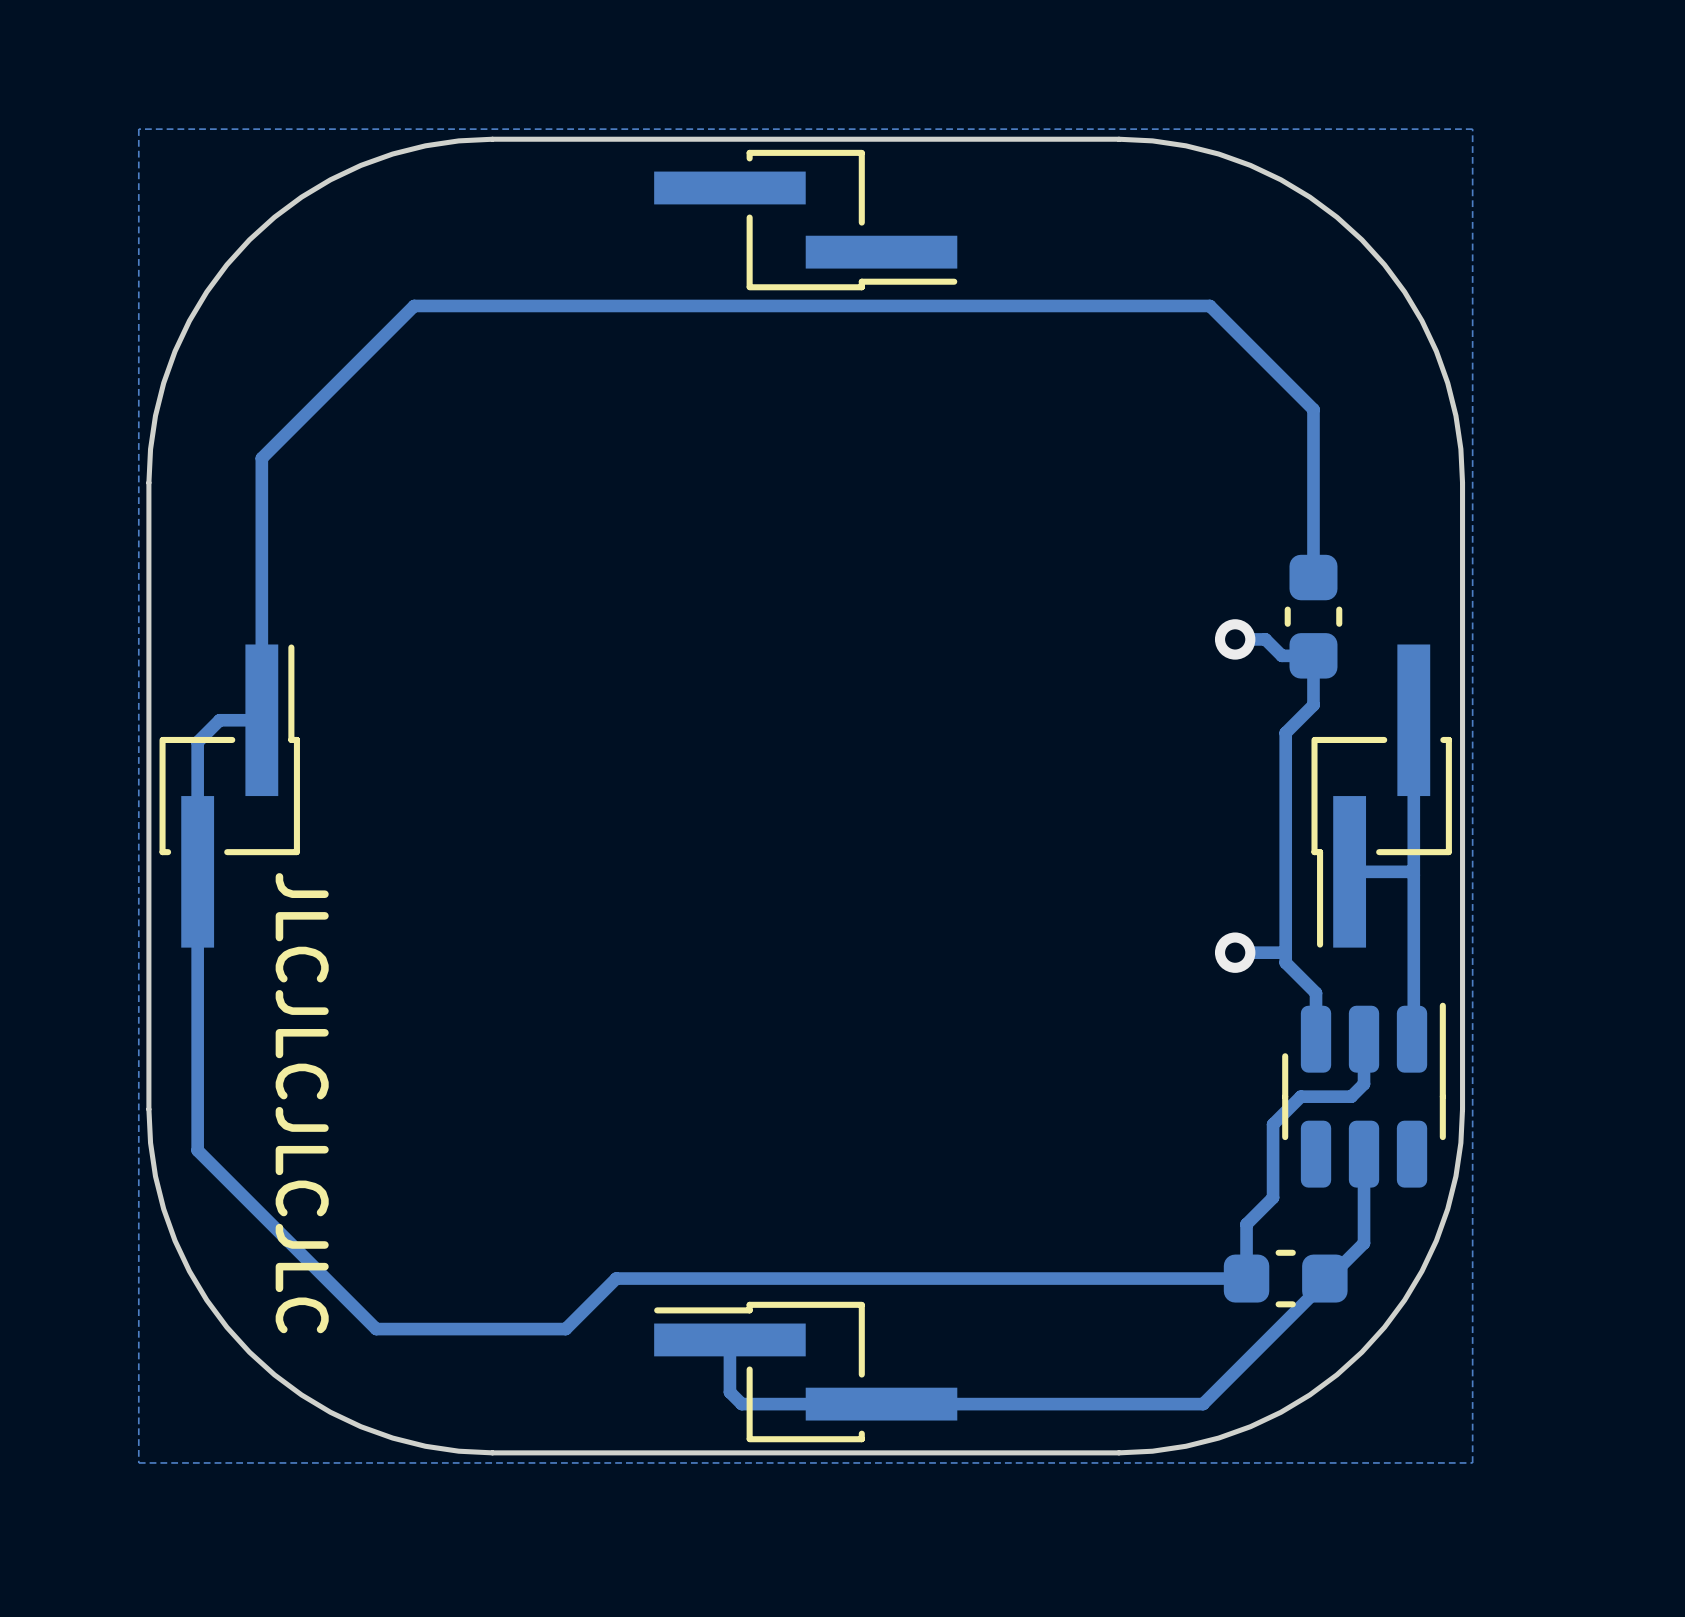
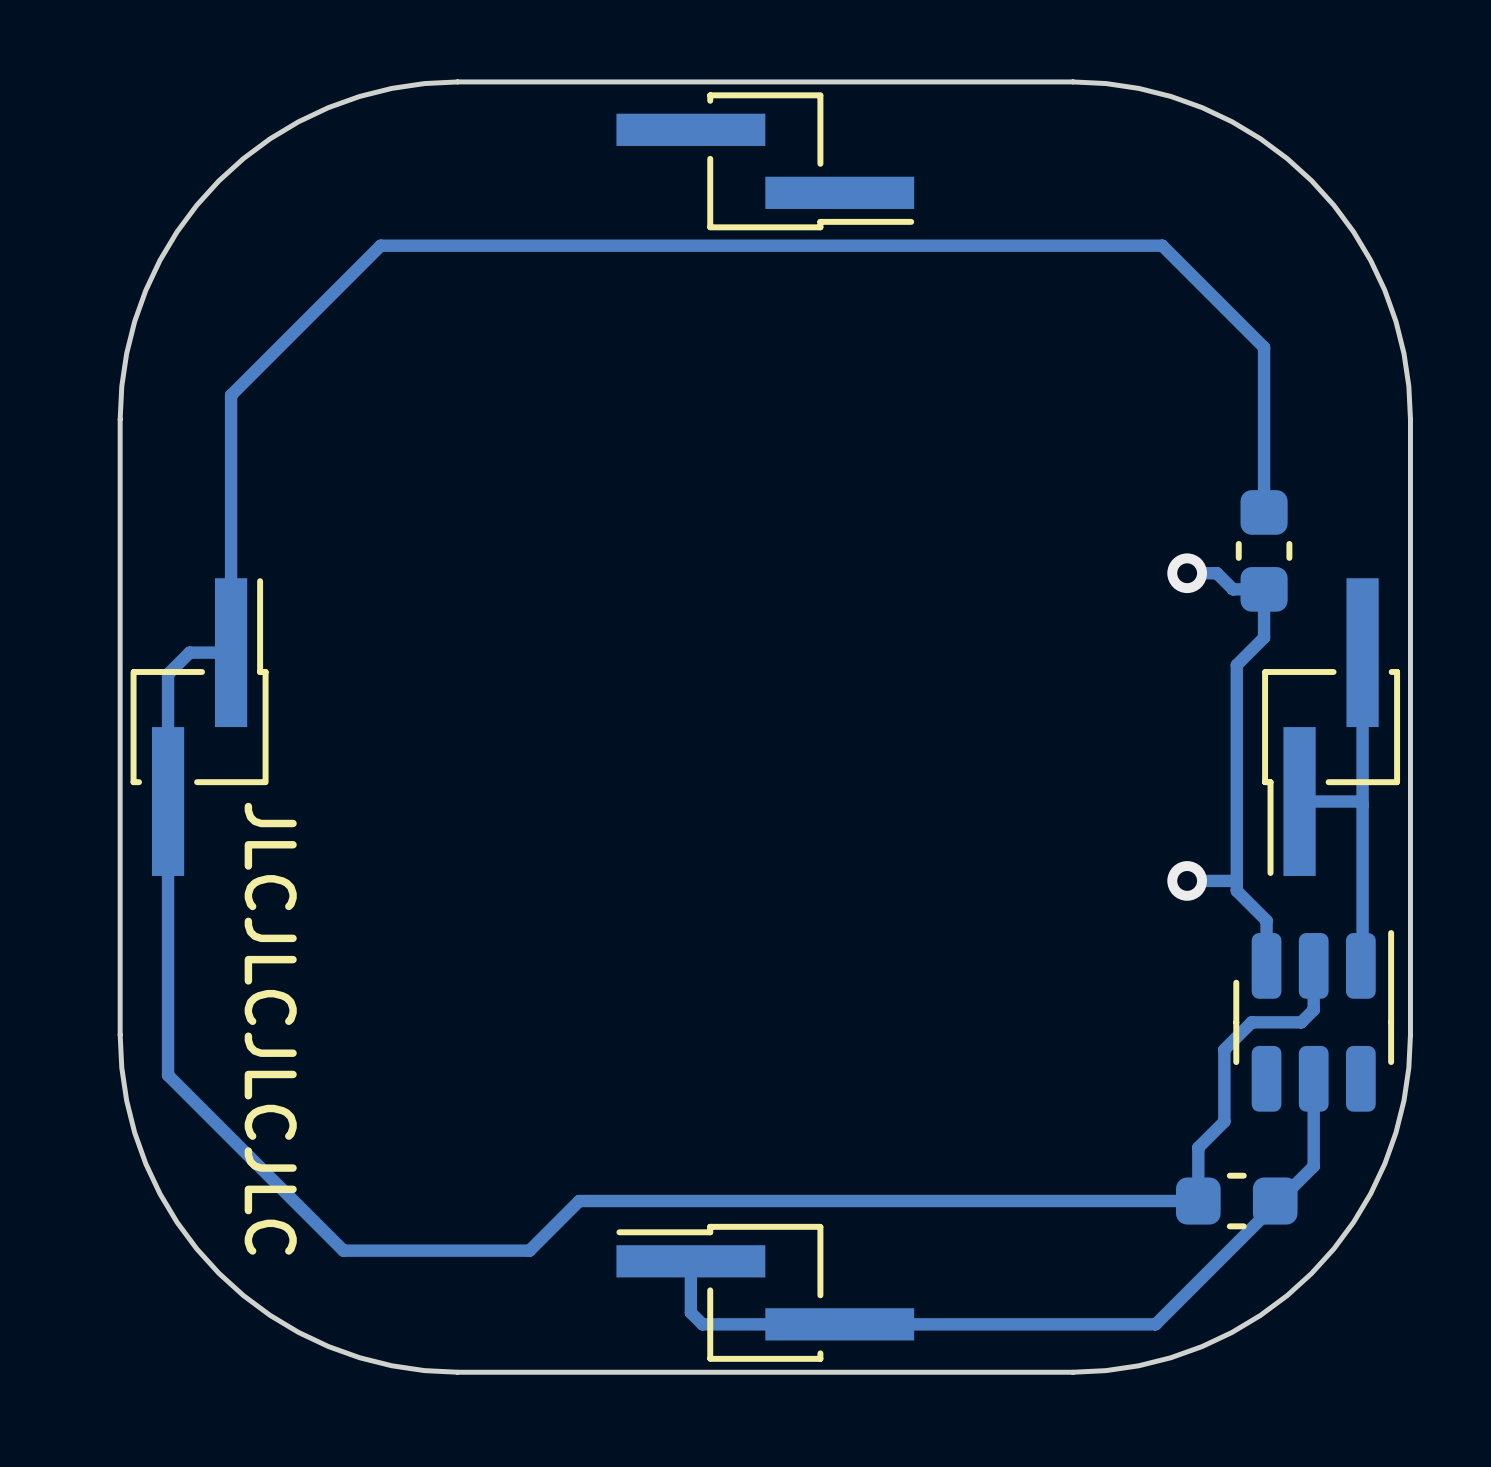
zone outline: (1472, 129) (1472, 1462) (138, 1462) (138, 129) (1472, 129) -> none

